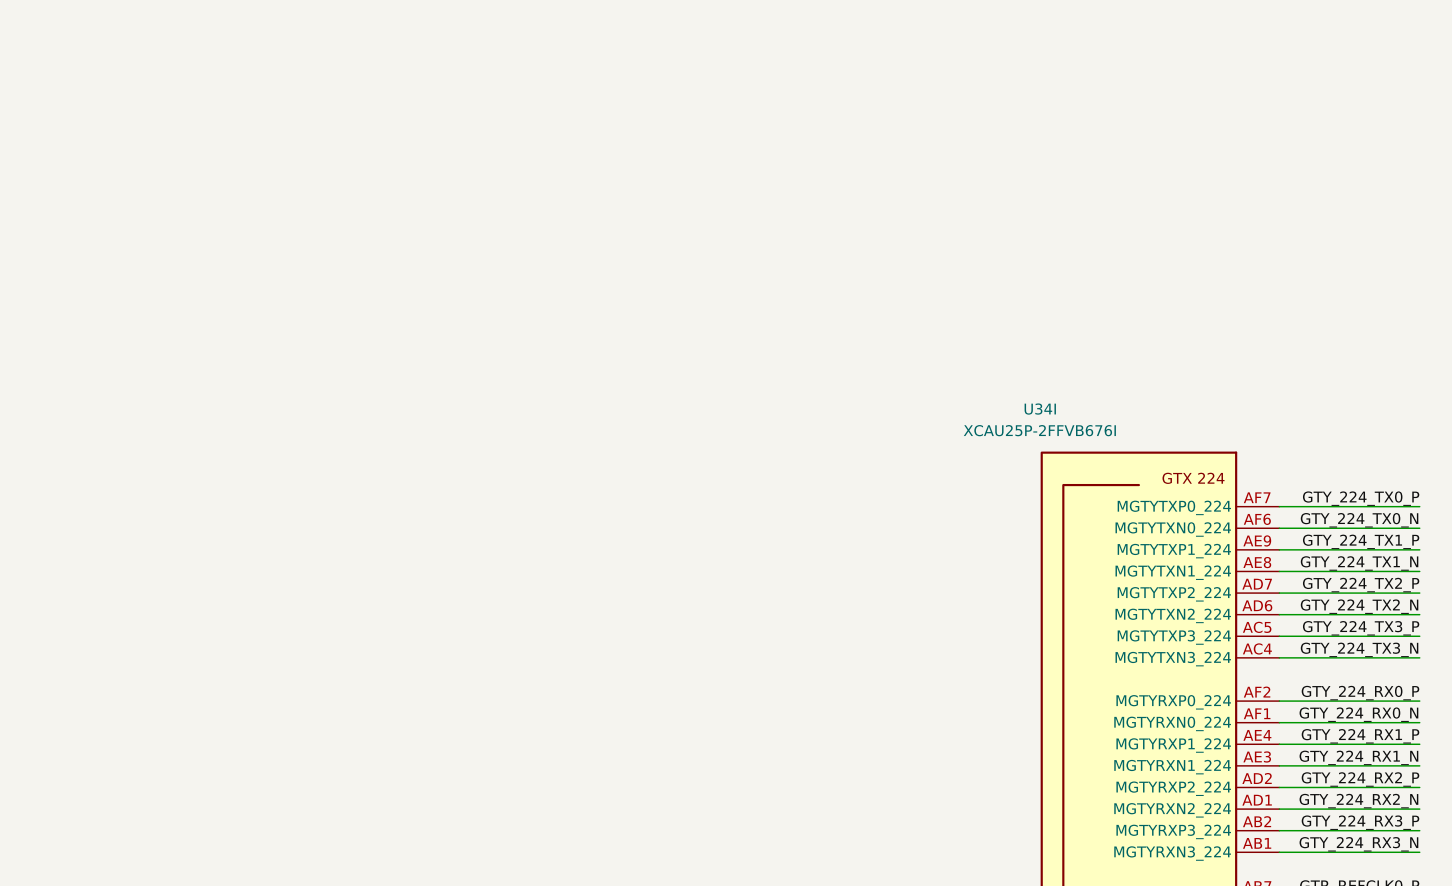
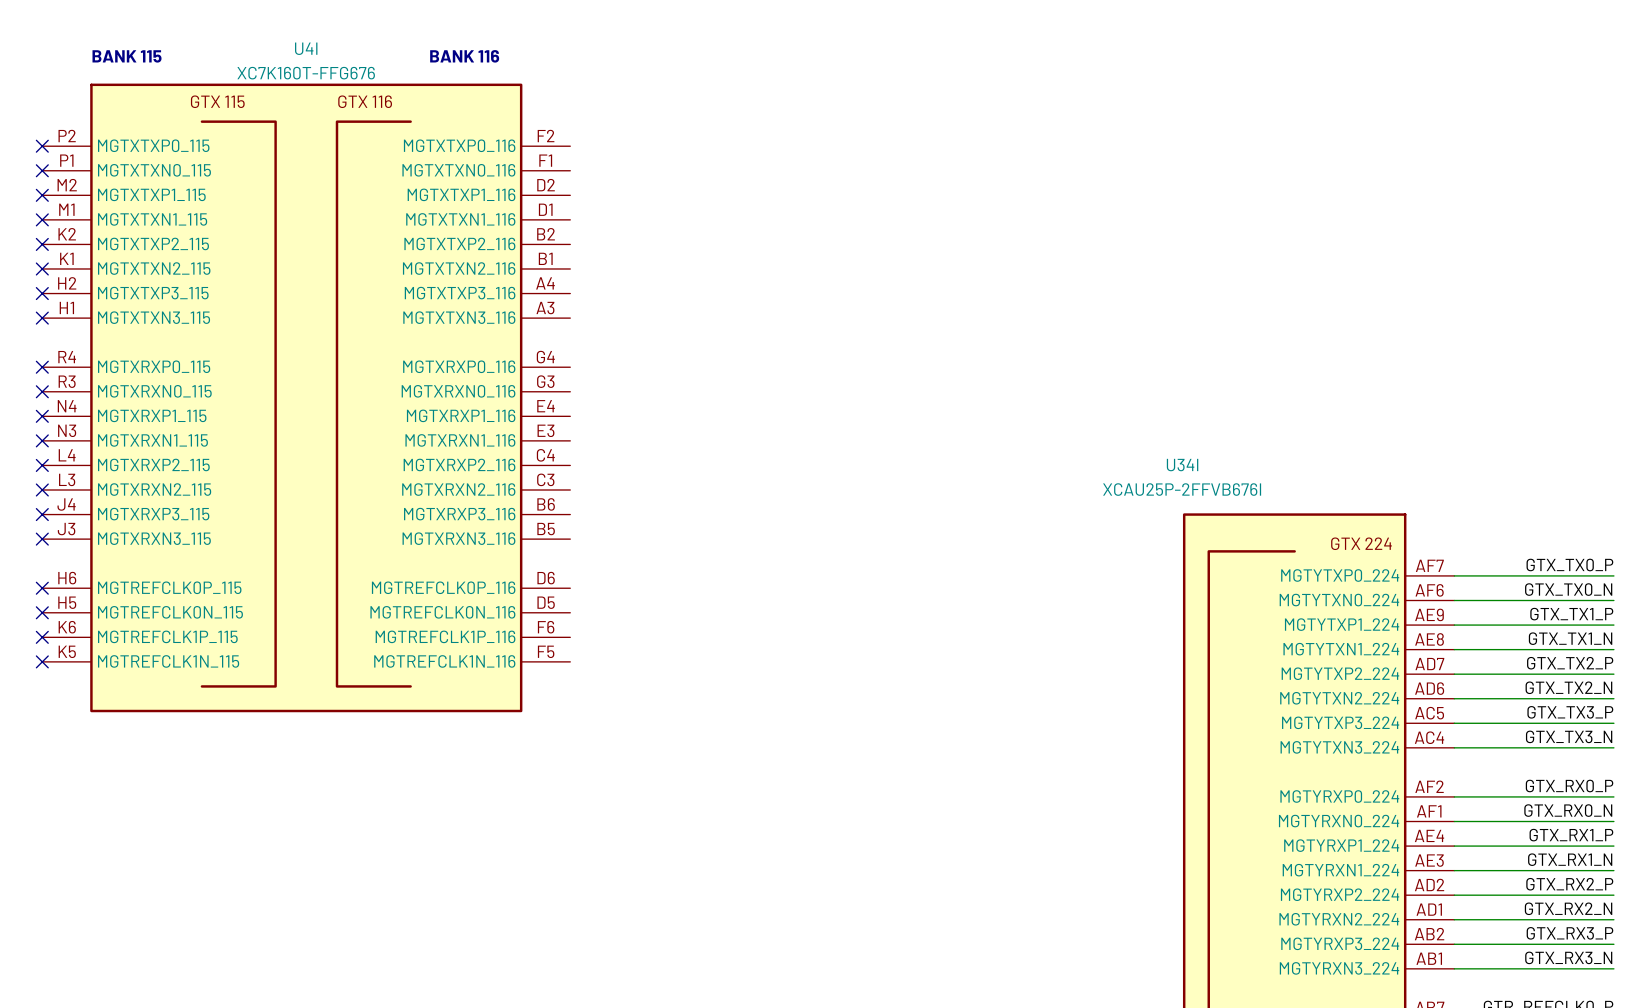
text: none -> BANK 115 (127, 56)
text: none -> BANK 116 (464, 56)
no-connect mark: none -> (42, 146)
no-connect mark: none -> (42, 170)
no-connect mark: none -> (42, 195)
no-connect mark: none -> (42, 219)
no-connect mark: none -> (42, 244)
no-connect mark: none -> (42, 268)
no-connect mark: none -> (42, 293)
no-connect mark: none -> (42, 318)
no-connect mark: none -> (42, 367)
no-connect mark: none -> (42, 391)
U4I: none -> XC7K160T-FFG676 (306, 397)
no-connect mark: none -> (42, 416)
no-connect mark: none -> (42, 440)
no-connect mark: none -> (42, 465)
no-connect mark: none -> (42, 490)
no-connect mark: none -> (42, 514)
no-connect mark: none -> (42, 539)
label: GTY_224_TX0_P (1361, 498) -> GTX_TX0_P (1569, 565)
no-connect mark: none -> (42, 588)
label: GTY_224_TX0_N (1359, 520) -> GTX_TX0_N (1568, 589)
no-connect mark: none -> (42, 612)
label: GTY_224_TX1_P (1361, 541) -> GTX_TX1_P (1571, 614)
no-connect mark: none -> (42, 637)
label: GTY_224_TX1_N (1359, 563) -> GTX_TX1_N (1570, 638)
no-connect mark: none -> (42, 661)
label: GTY_224_TX2_P (1361, 585) -> GTX_TX2_P (1570, 663)
label: GTY_224_TX2_N (1359, 606) -> GTX_TX2_N (1568, 687)
label: GTY_224_TX3_P (1361, 628) -> GTX_TX3_P (1570, 712)
label: GTY_224_TX3_N (1359, 649) -> GTX_TX3_N (1569, 736)
label: GTY_224_RX0_P (1360, 693) -> GTX_RX0_P (1569, 786)
label: GTY_224_RX0_N (1358, 714) -> GTX_RX0_N (1568, 810)
label: GTY_224_RX1_P (1360, 736) -> GTX_RX1_P (1571, 835)
label: GTY_224_RX1_N (1358, 757) -> GTX_RX1_N (1570, 859)
label: GTY_224_RX2_P (1360, 779) -> GTX_RX2_P (1569, 884)
label: GTY_224_RX2_N (1358, 801) -> GTX_RX2_N (1568, 908)
label: GTY_224_RX3_P (1360, 822) -> GTX_RX3_P (1569, 933)
label: GTY_224_RX3_N (1358, 844) -> GTX_RX3_N (1568, 957)

